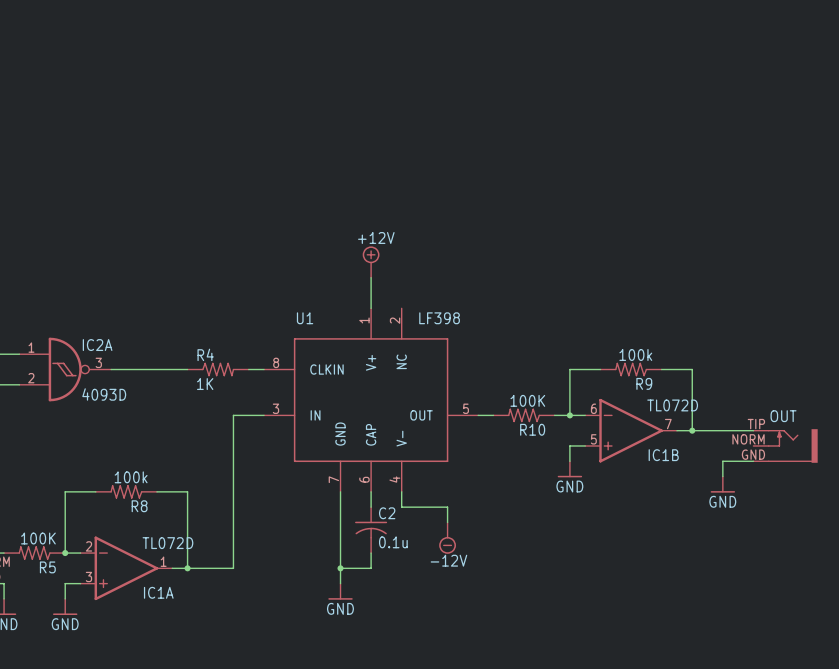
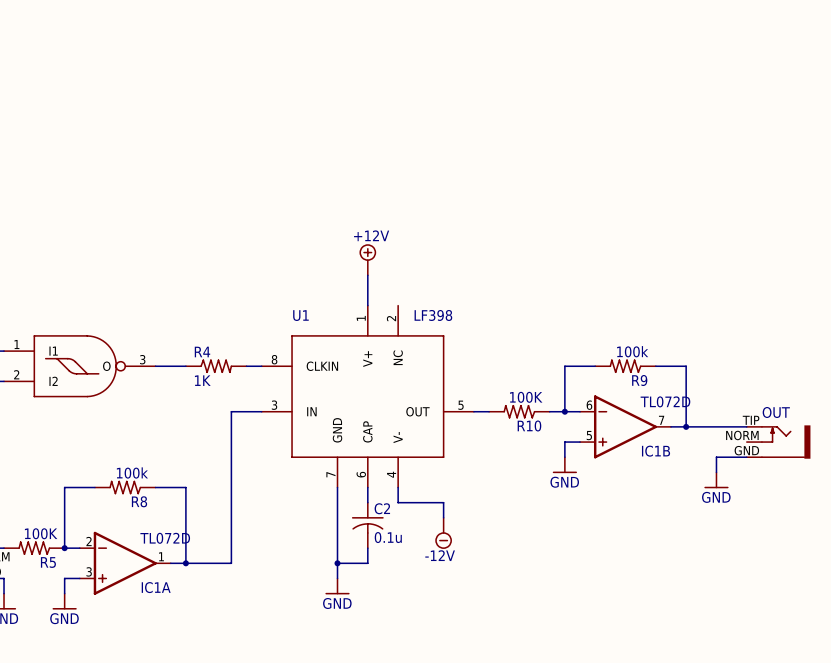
IC2A: 4093D (65, 369) -> none
part: none -> (79, 366)

